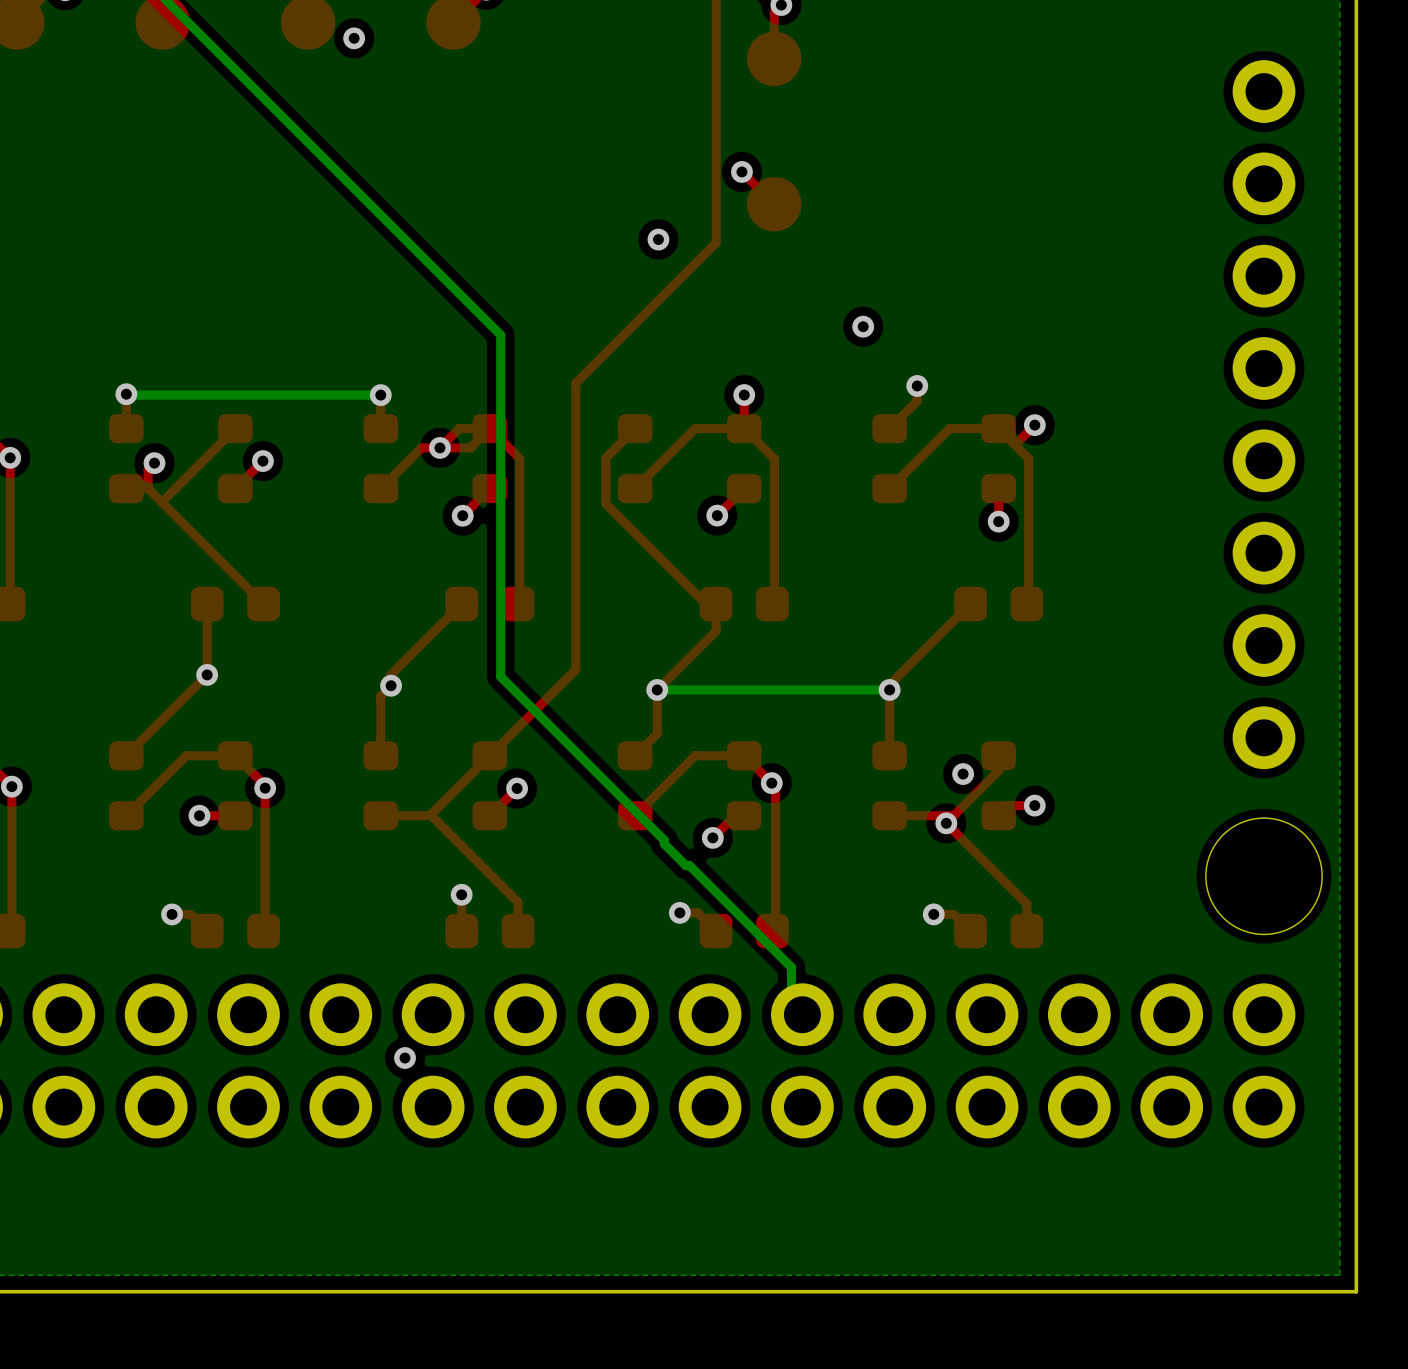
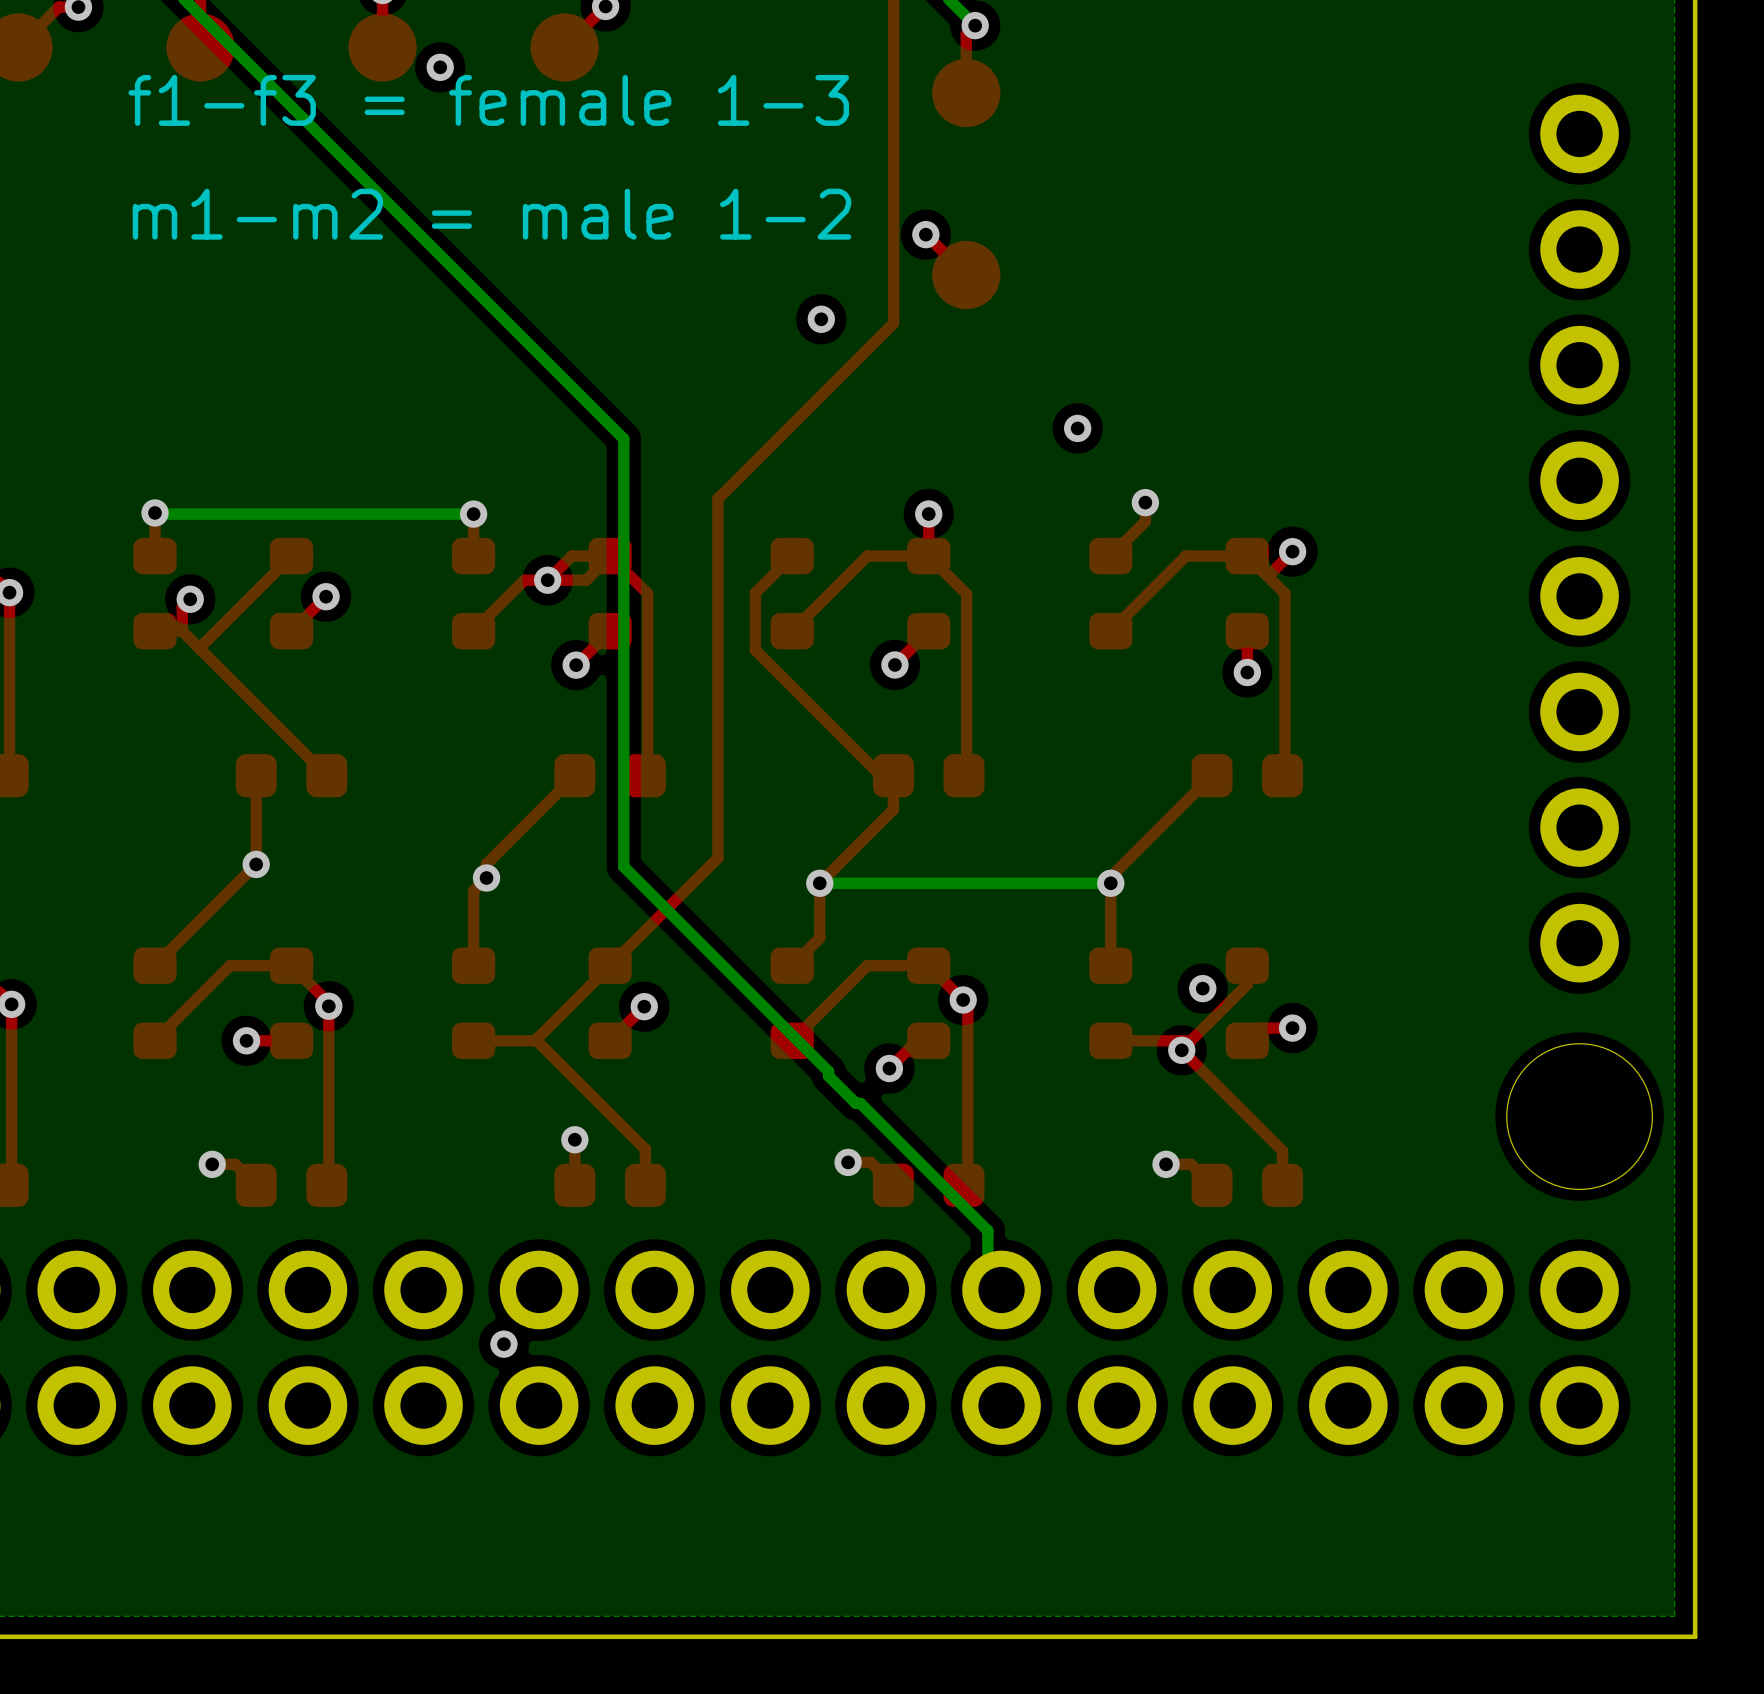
text: none -> f1-f3 = female 1-3 (488, 100)
text: none -> m1-m2 = male 1-2 (491, 214)

